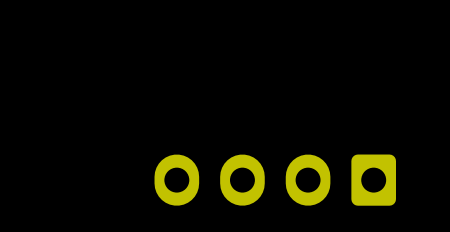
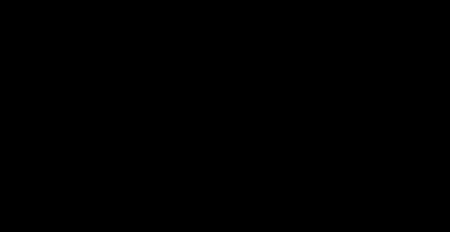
part: (275, 180) -> none

